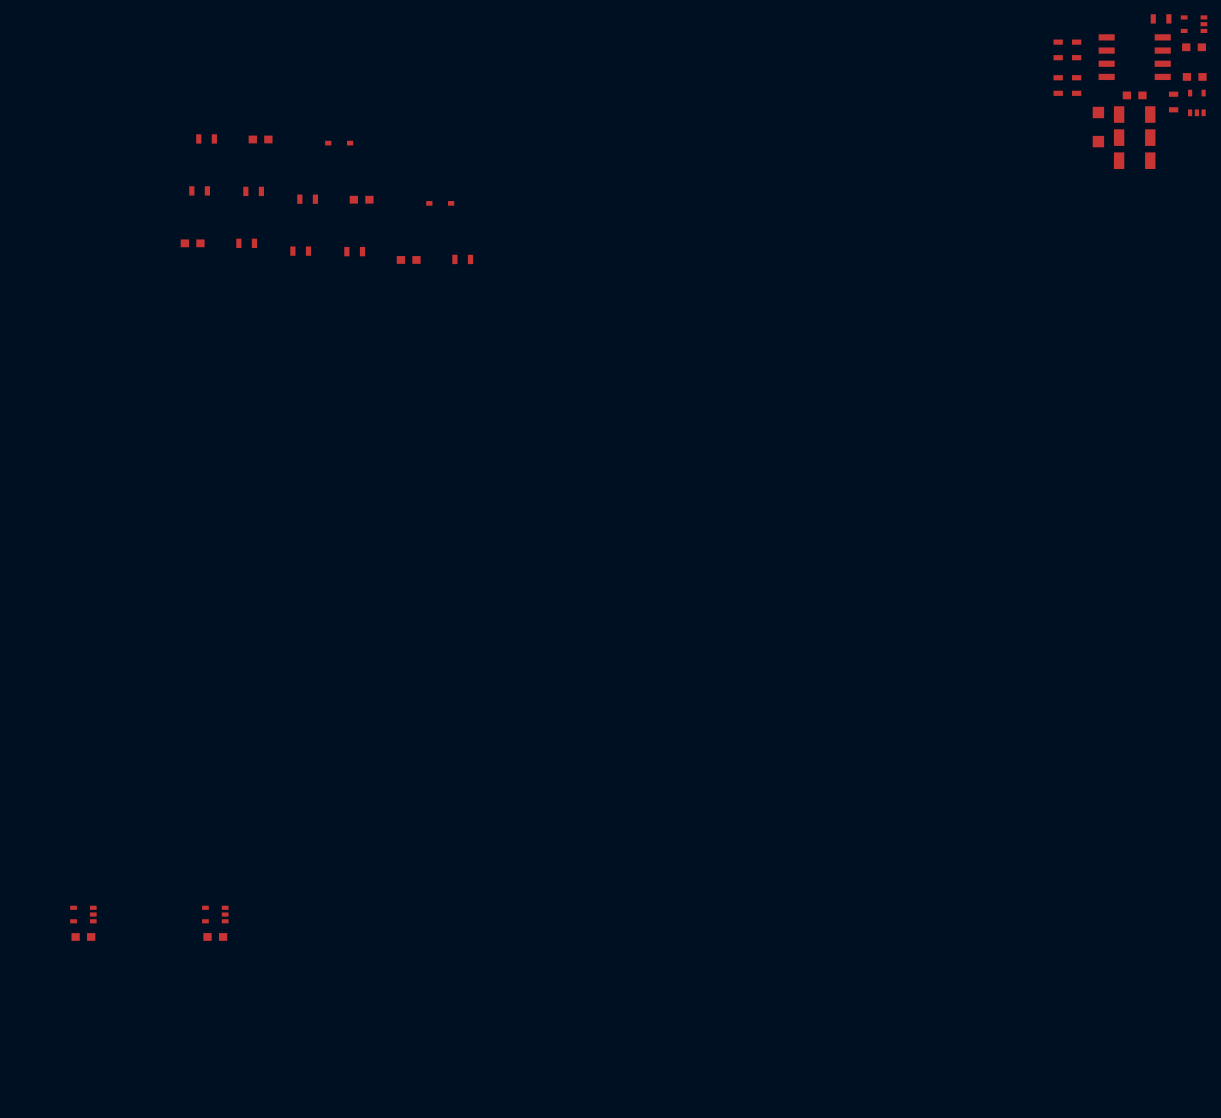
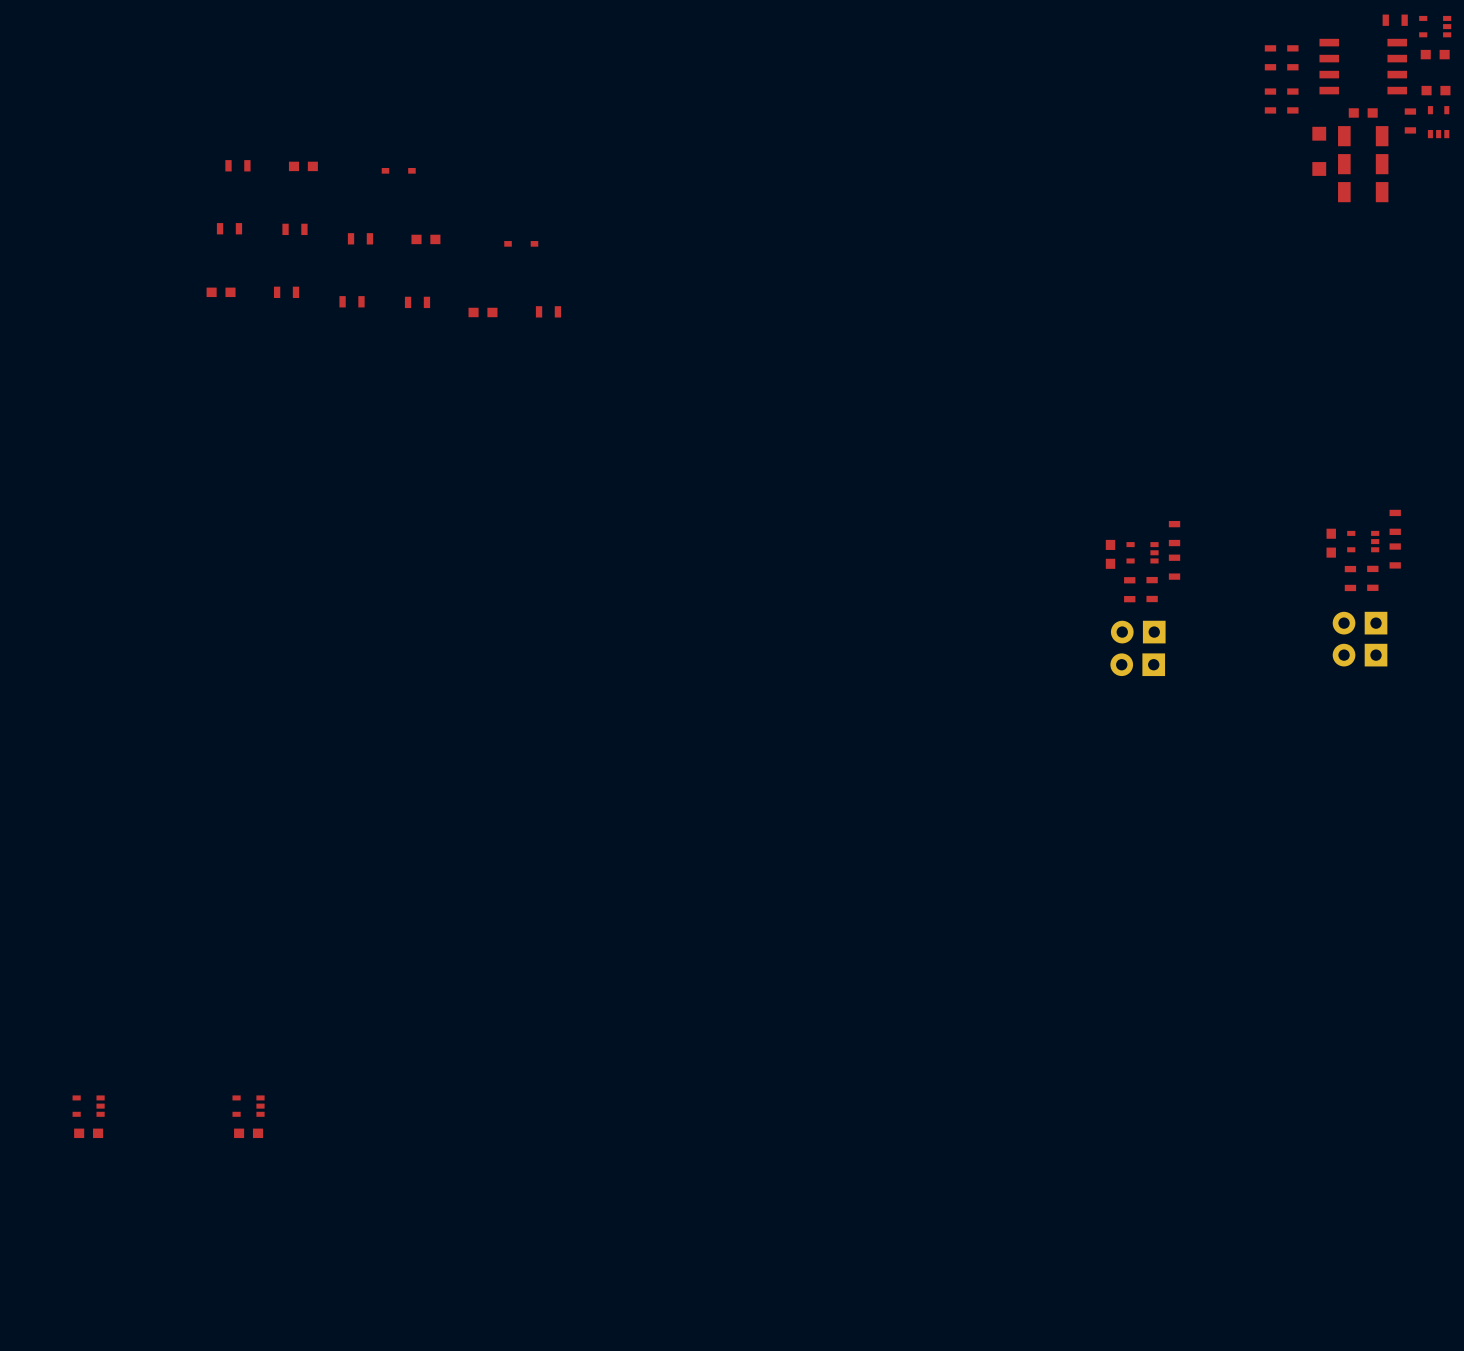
part: none -> (1395, 522)
part: none -> (1174, 533)
part: none -> (1363, 541)
part: none -> (1331, 543)
part: none -> (1142, 552)
part: none -> (1110, 554)
part: none -> (1395, 555)
part: none -> (1174, 567)
part: none -> (1350, 578)
part: none -> (1372, 578)
part: none -> (1129, 589)
part: none -> (1152, 589)
part: none -> (1360, 623)
part: none -> (1138, 632)
part: none -> (1360, 655)
part: none -> (1137, 664)

